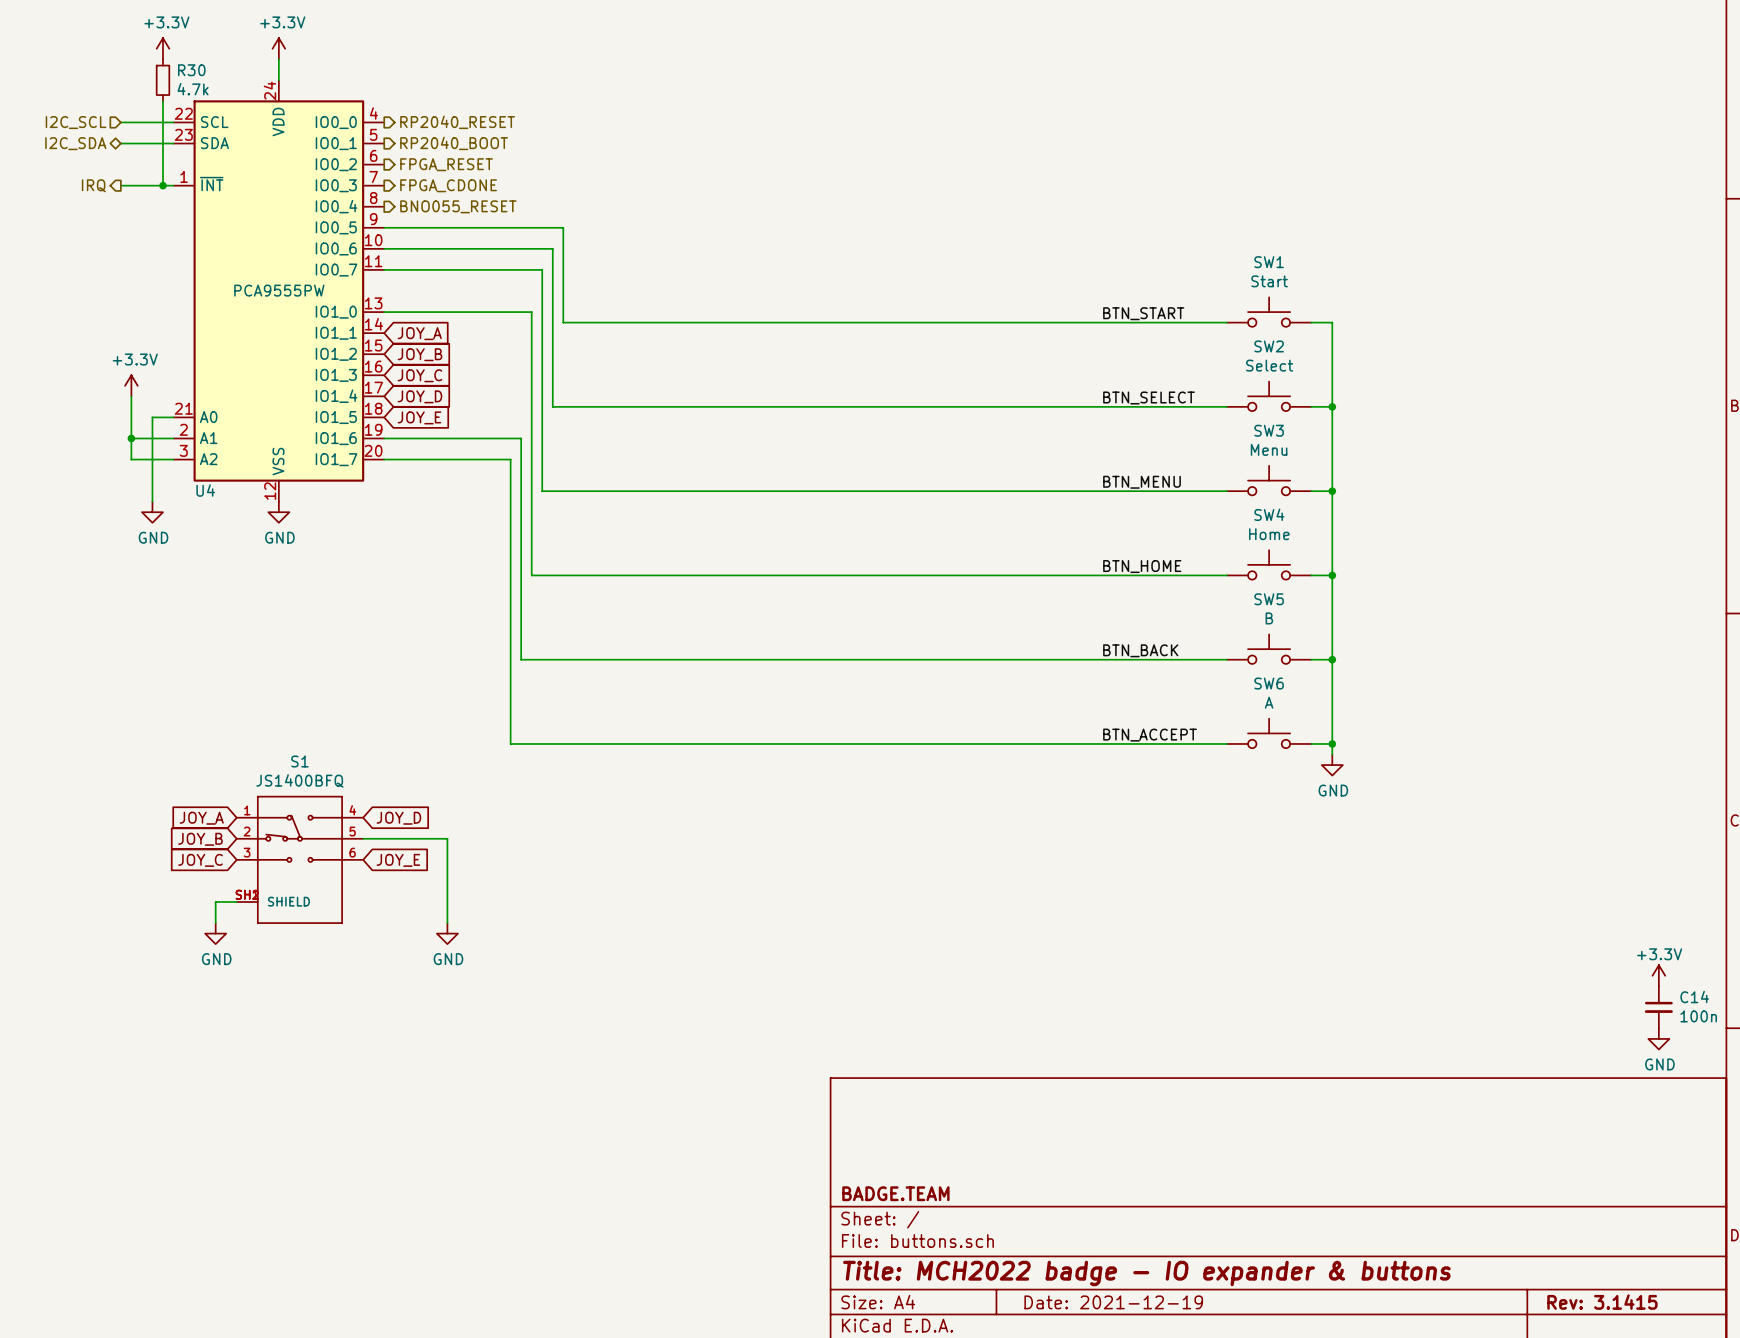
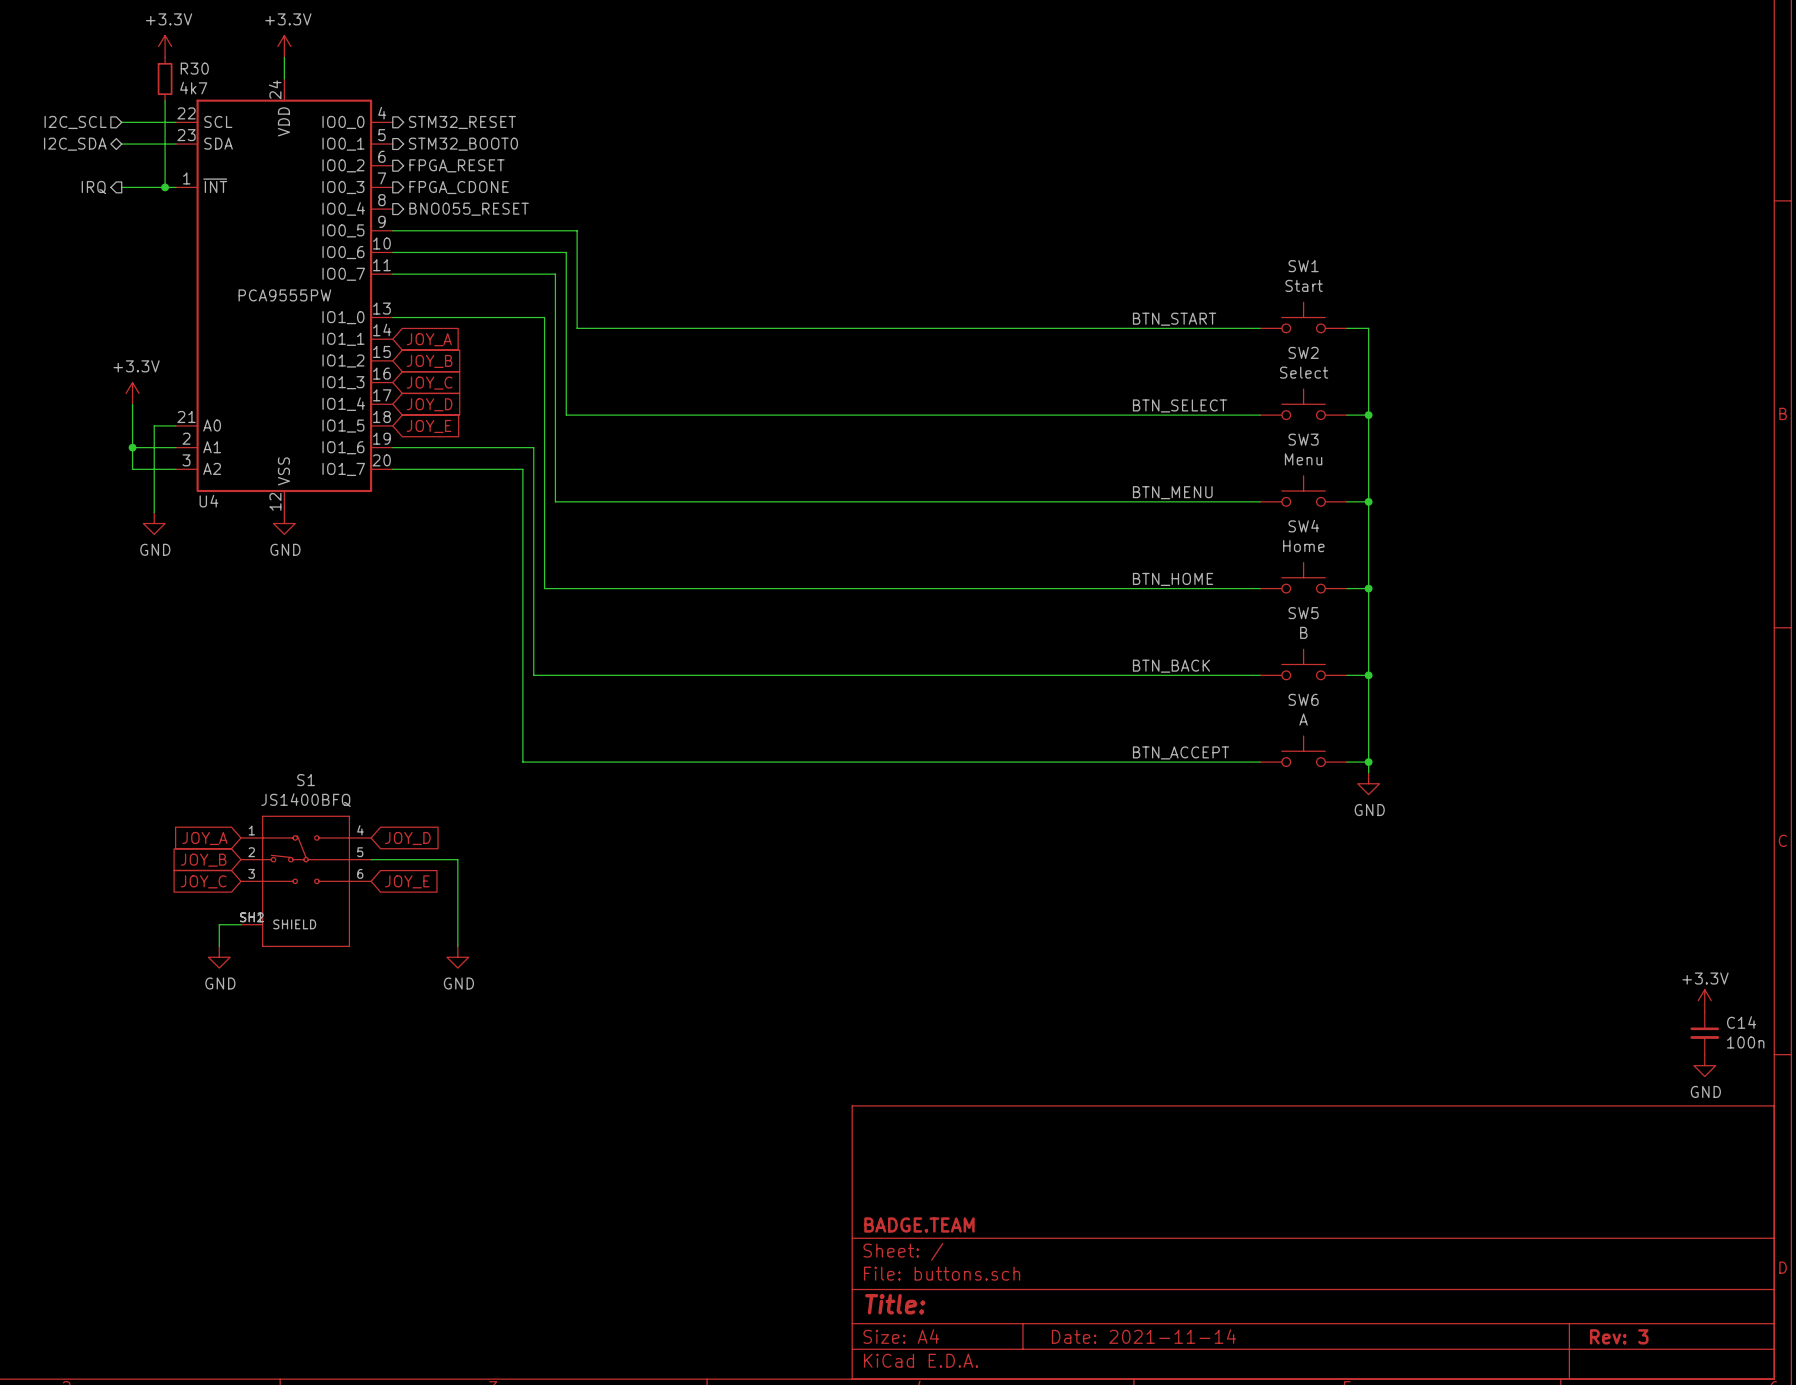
R30 value: 4.7k (193, 89) -> 4k7 (193, 88)
hierarchical label: RP2040_RESET (457, 122) -> STM32_RESET (462, 122)
hierarchical label: RP2040_BOOT (454, 143) -> STM32_BOOT0 (463, 144)
title block: Title: MCH2022 badge - IO expander & buttons (1146, 1273) -> Title: (895, 1304)
title block: Date: 2021-12-19 (1113, 1302) -> Date: 2021-11-14 (1143, 1336)
title block: Rev: 3.1415 (1602, 1302) -> Rev: 3 (1619, 1336)

